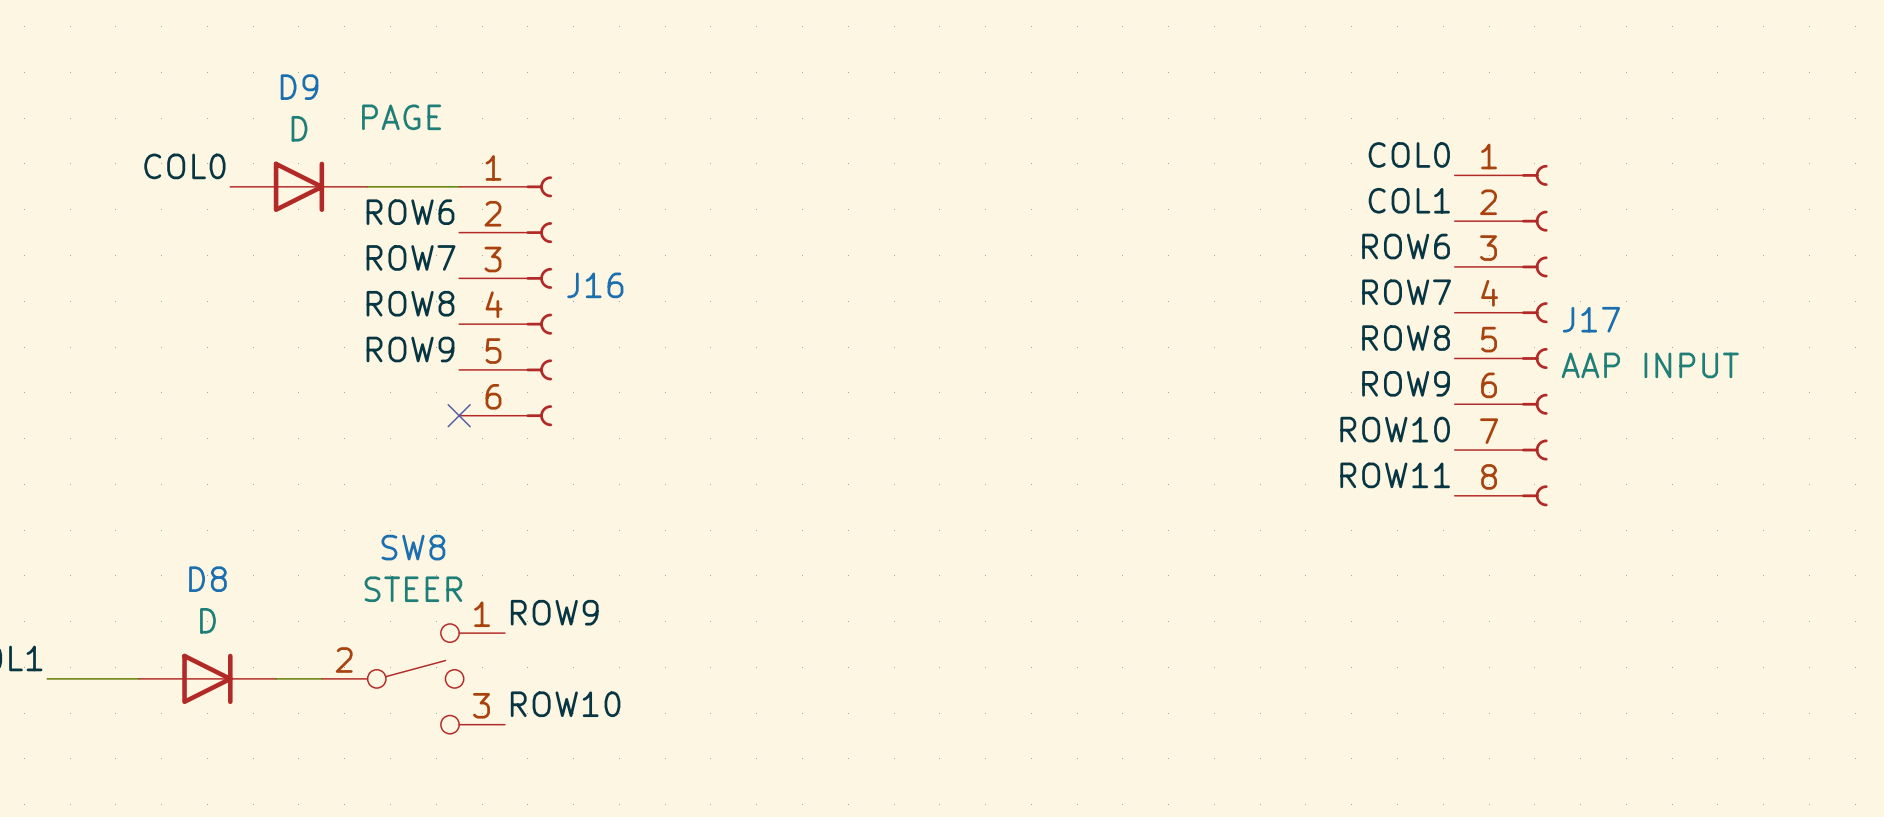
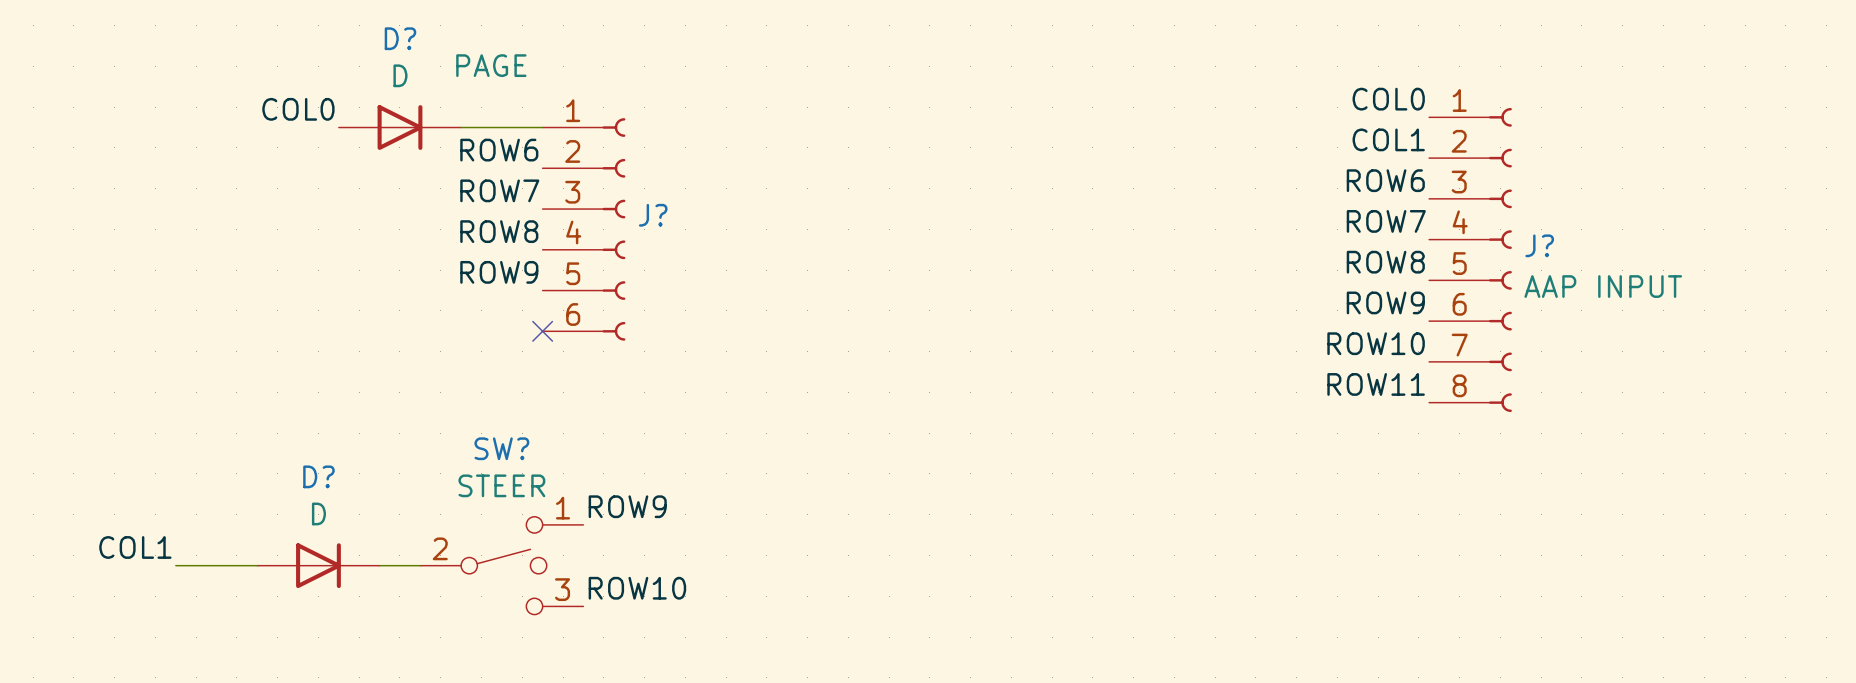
D9 name: D9 (299, 87) -> D? (400, 38)
J16 name: J16 (595, 285) -> J? (653, 215)
J17 name: J17 (1591, 319) -> J? (1539, 245)
SW8 name: SW8 (413, 547) -> SW? (501, 448)
D8 name: D8 (207, 579) -> D? (318, 476)

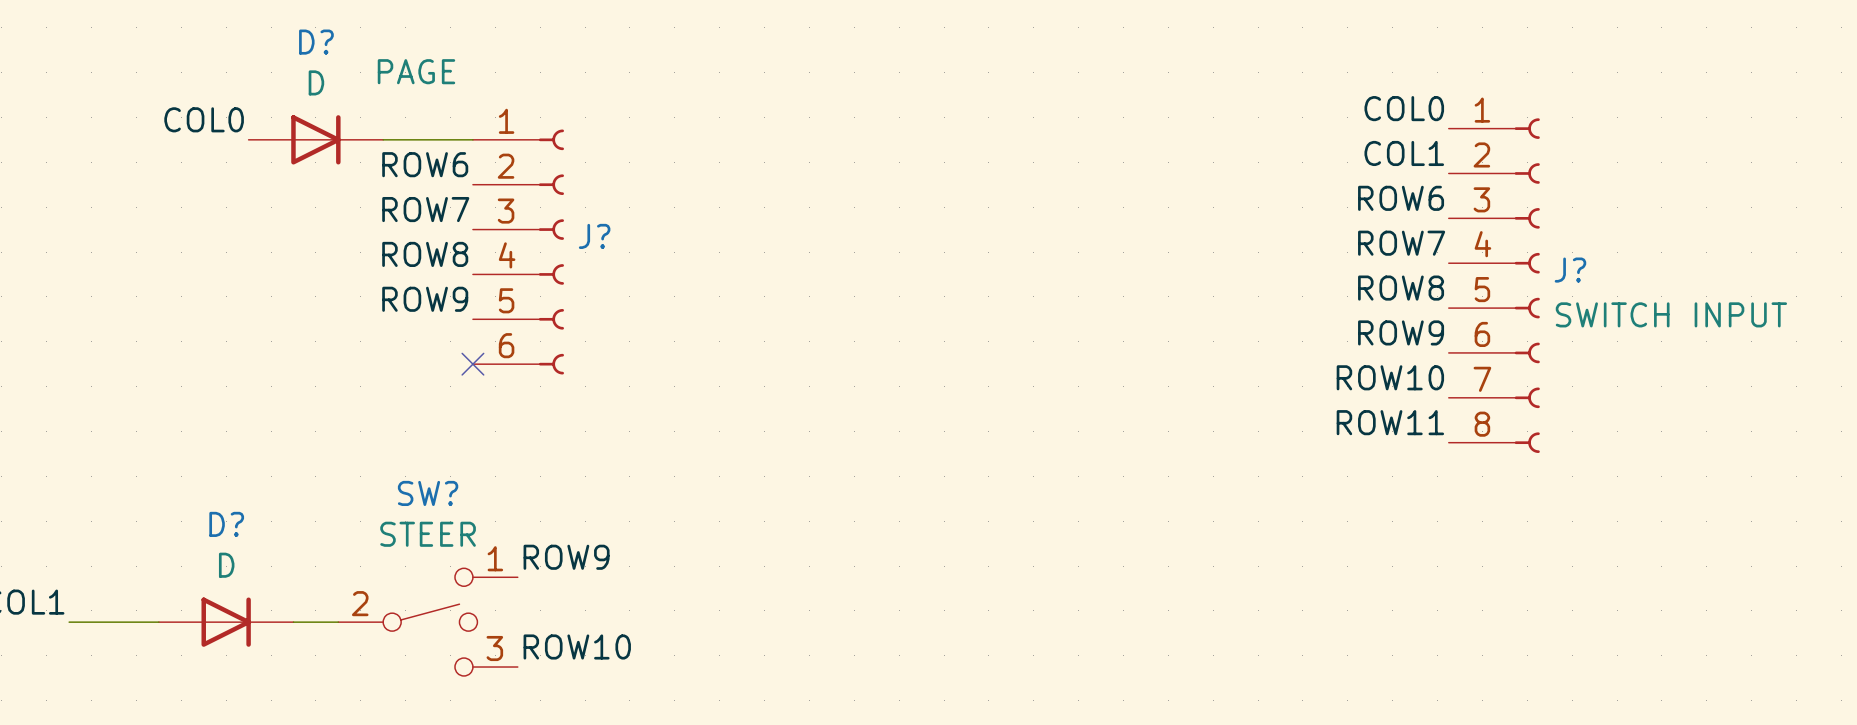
J? value: AAP INPUT (1603, 286) -> SWITCH INPUT (1671, 314)

